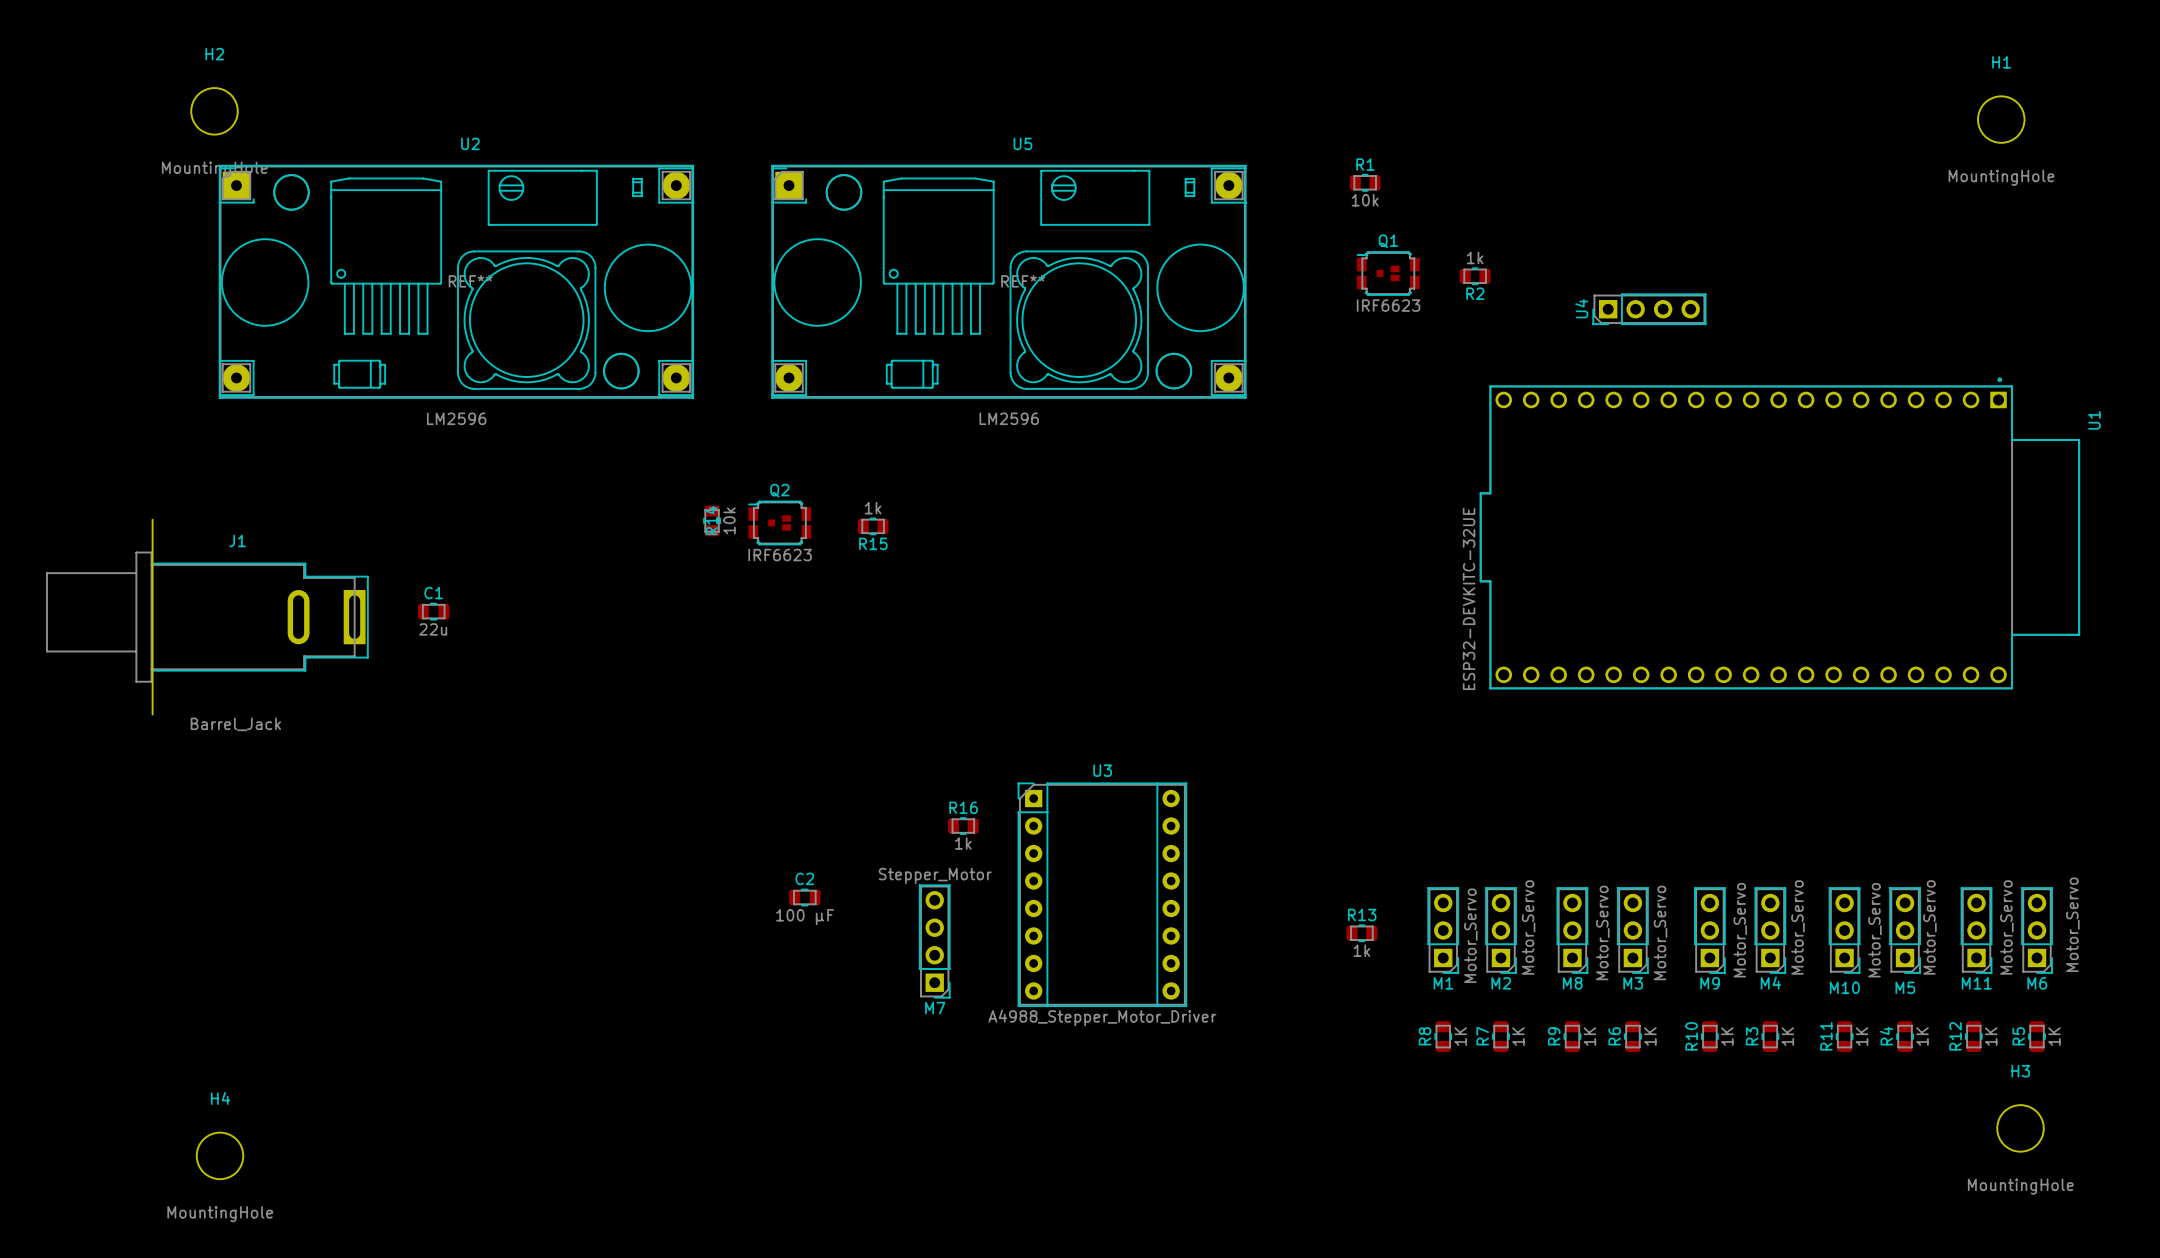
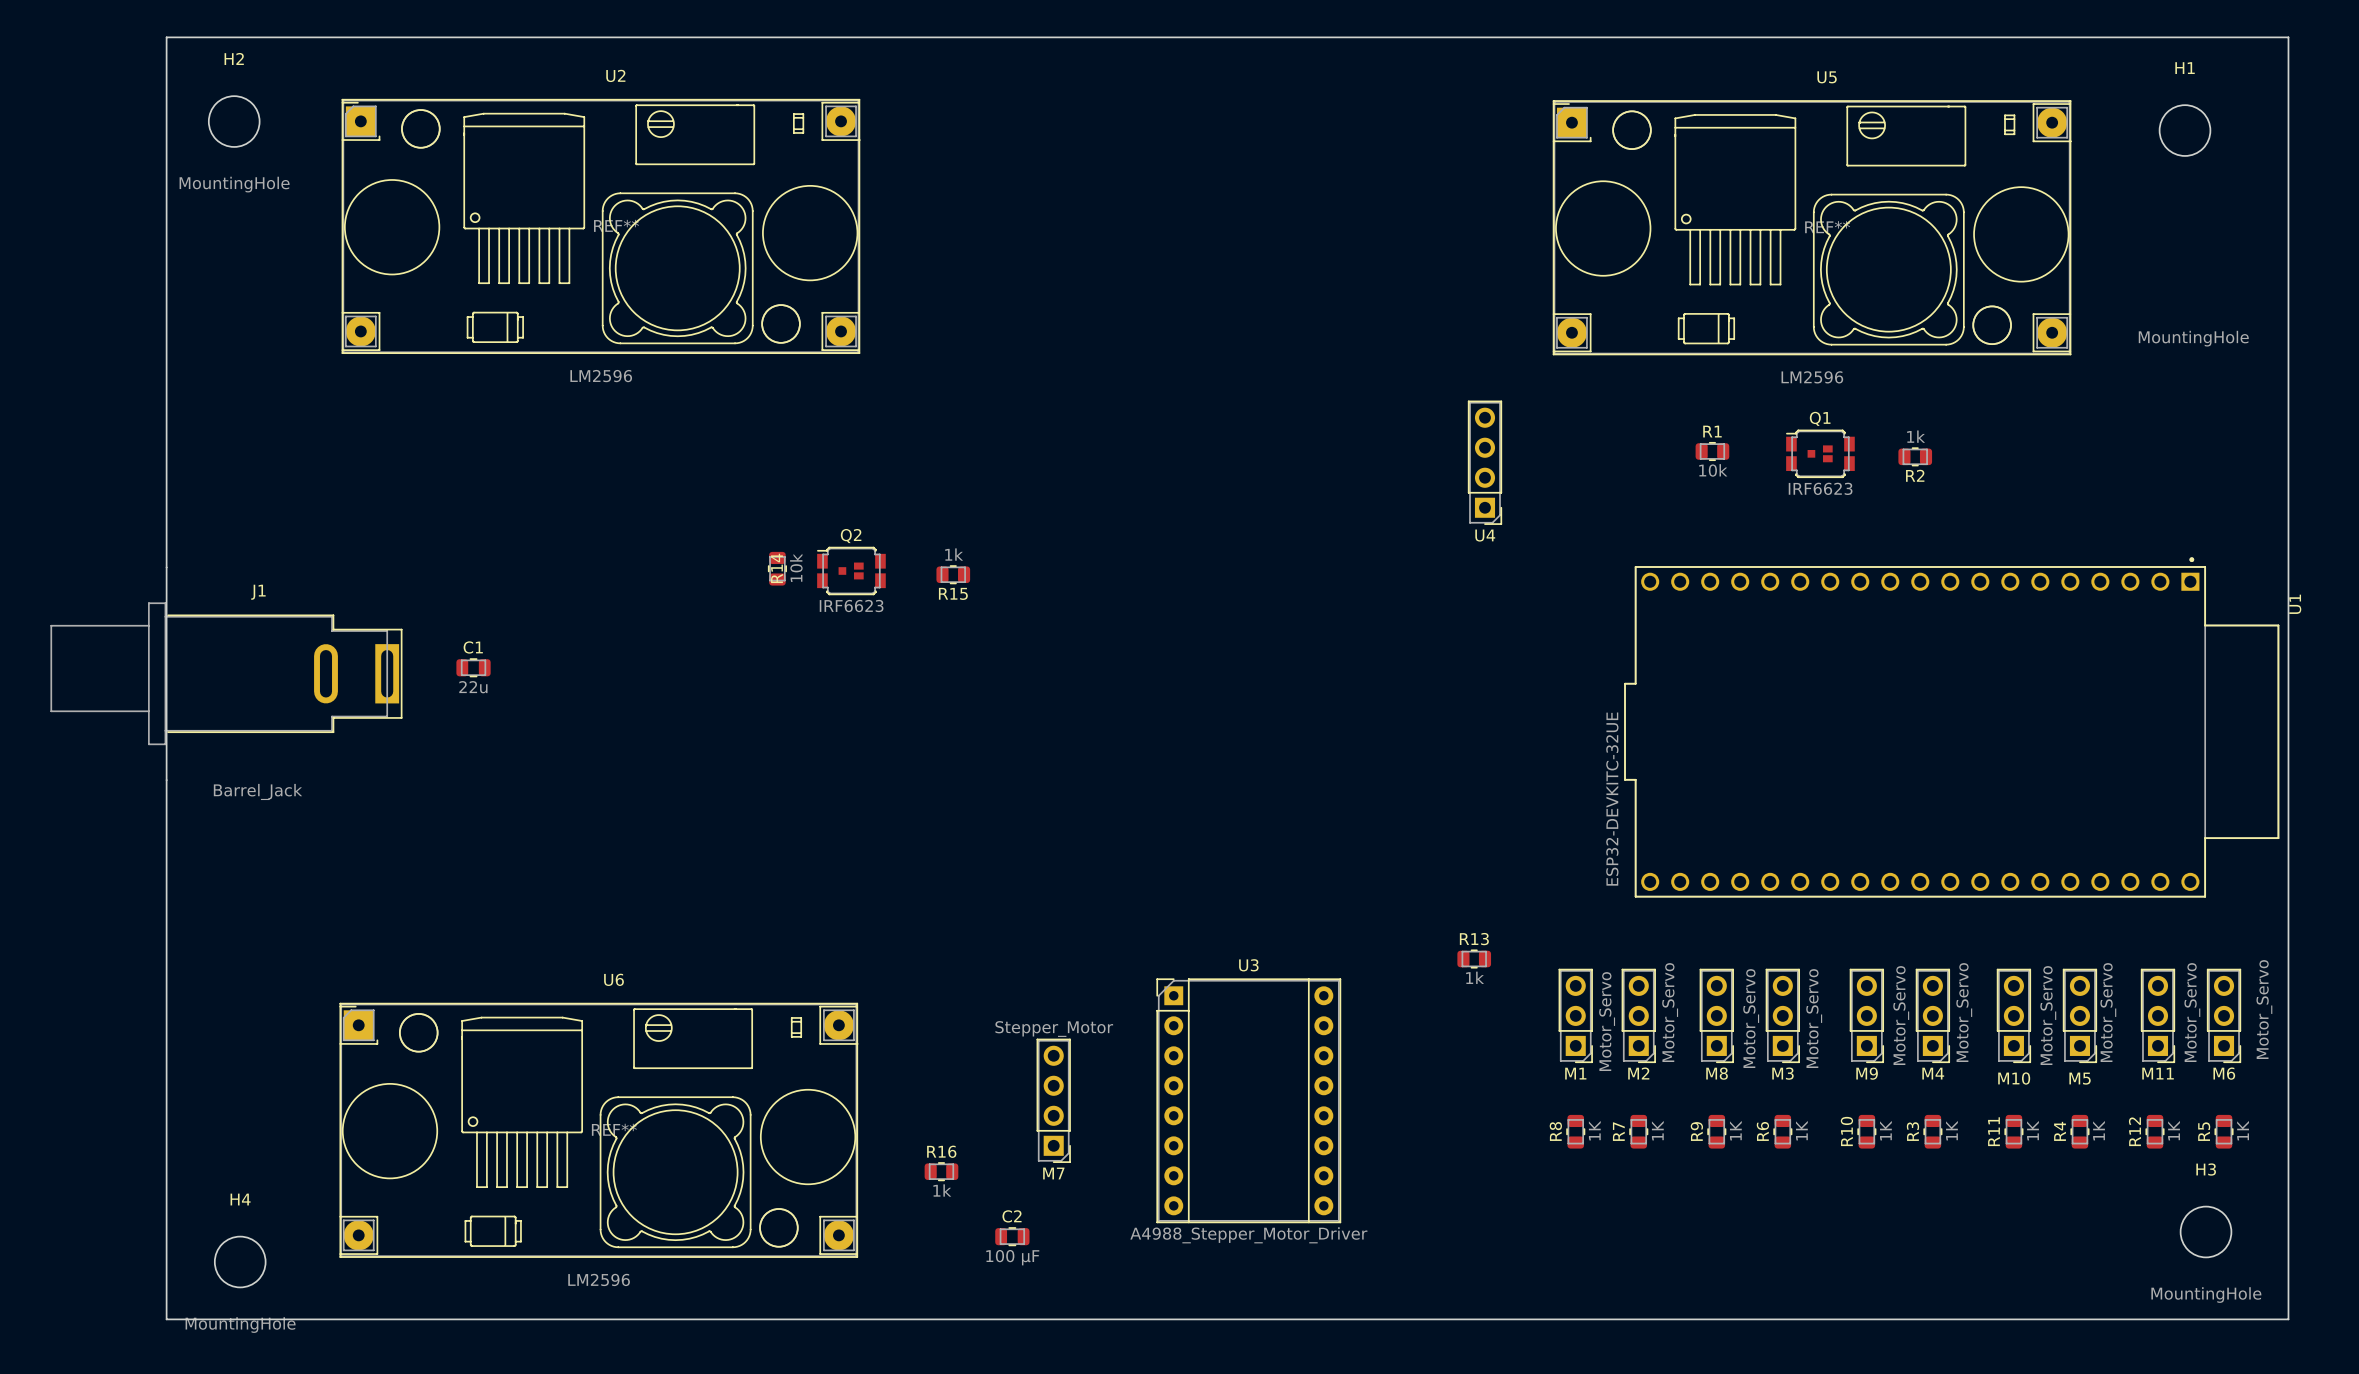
H1 value position: MountingHole (2001, 177) -> MountingHole (2193, 338)
R1 position: (1365, 182) -> (1712, 451)
Q1 position: (1388, 273) -> (1820, 453)
R2 position: (1475, 276) -> (1915, 456)
U2 position: (456, 281) -> (601, 226)
U5 position: (1009, 281) -> (1812, 227)
U4 rotation: 0° (1649, 309) -> 90° counterclockwise (1484, 462)
U4 position: (1649, 309) -> (1484, 462)
board edge: none -> (166, 567) (166, 37) (2288, 37) (2288, 1319) (166, 1319) (166, 780)
U1 position: (1779, 533) -> (1951, 727)
R16 position: (963, 826) -> (941, 1171)
U3 position: (1102, 894) -> (1248, 1100)
C2 position: (804, 897) -> (1012, 1236)
R13 position: (1361, 933) -> (1474, 959)
M7 position: (934, 941) -> (1053, 1100)
U6: none -> LM2596 (598, 1130)

